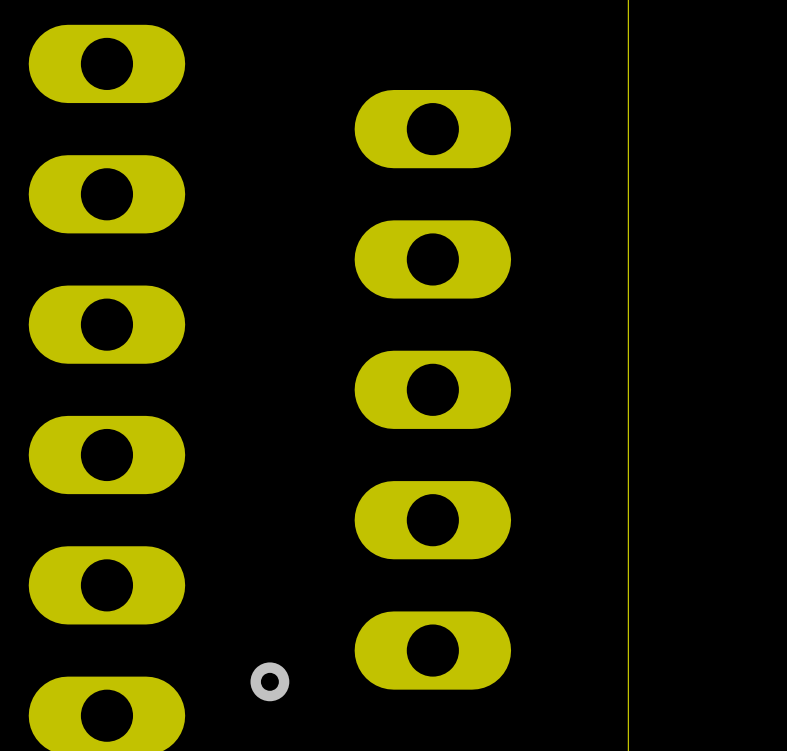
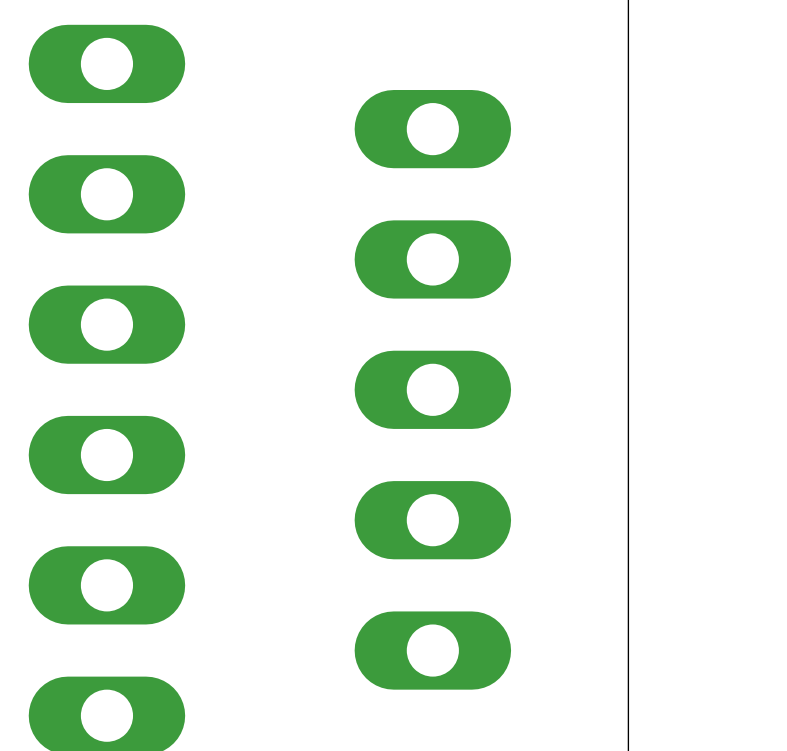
via: (269, 681) -> none

